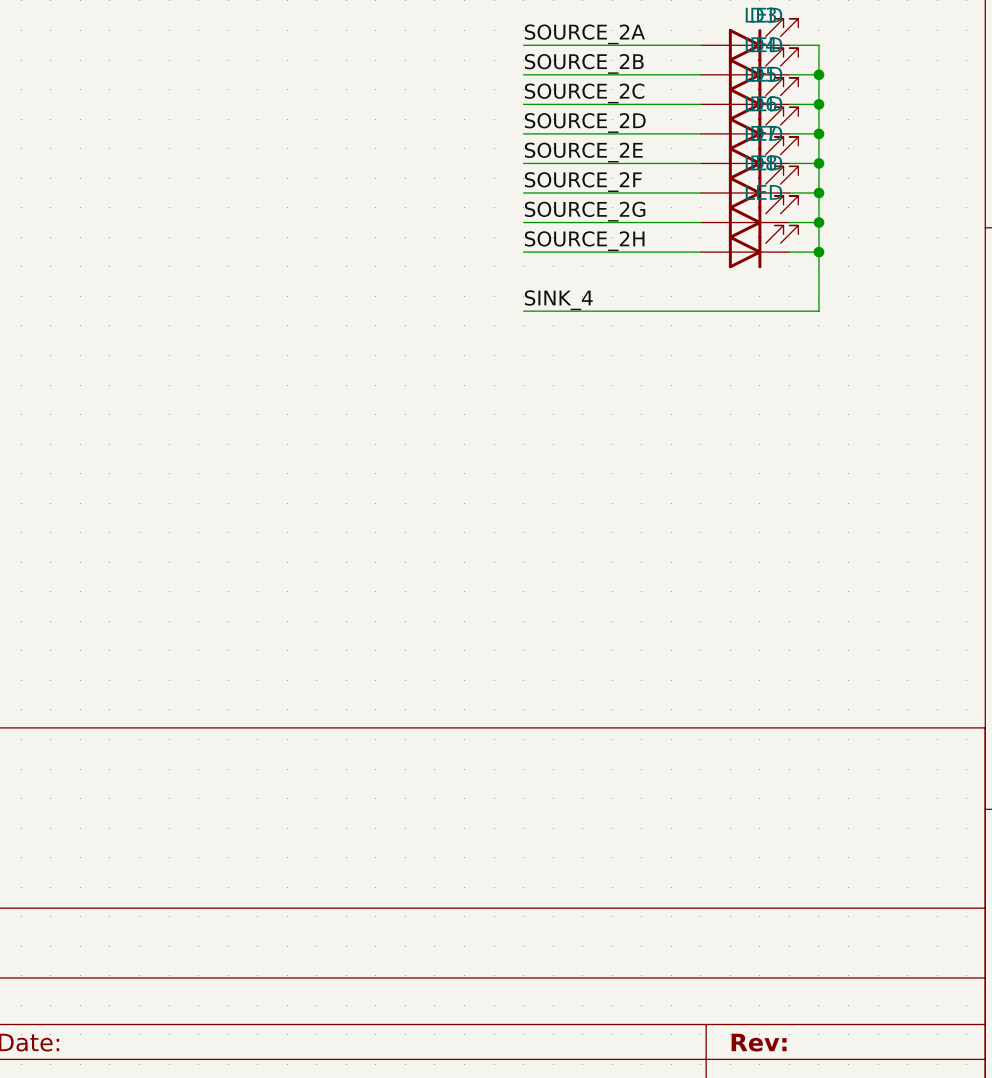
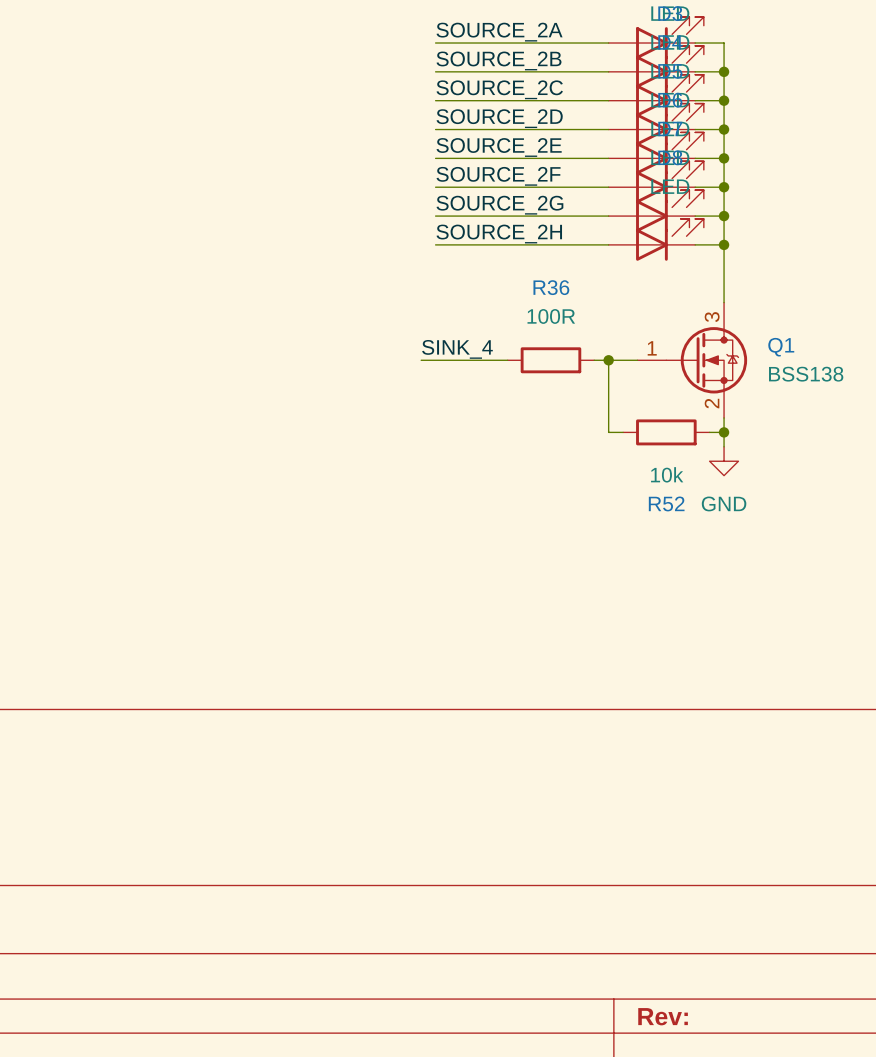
label position: SINK_4 (558, 300) -> SINK_4 (457, 349)
wire: (523, 311) (818, 311) -> none
wire: none -> (421, 360) (507, 360)
R36: none -> 100R (550, 360)
wire: none -> (594, 360) (637, 360)
wire: none -> (608, 360) (608, 432) (623, 432)
junction: none -> (608, 360)
Q1: none -> BSS138 (692, 360)
wire: none -> (724, 417) (724, 446)
R52: none -> 10k (666, 432)
wire: none -> (709, 432) (724, 432)
junction: none -> (724, 432)
power symbol: none -> GND (724, 461)

